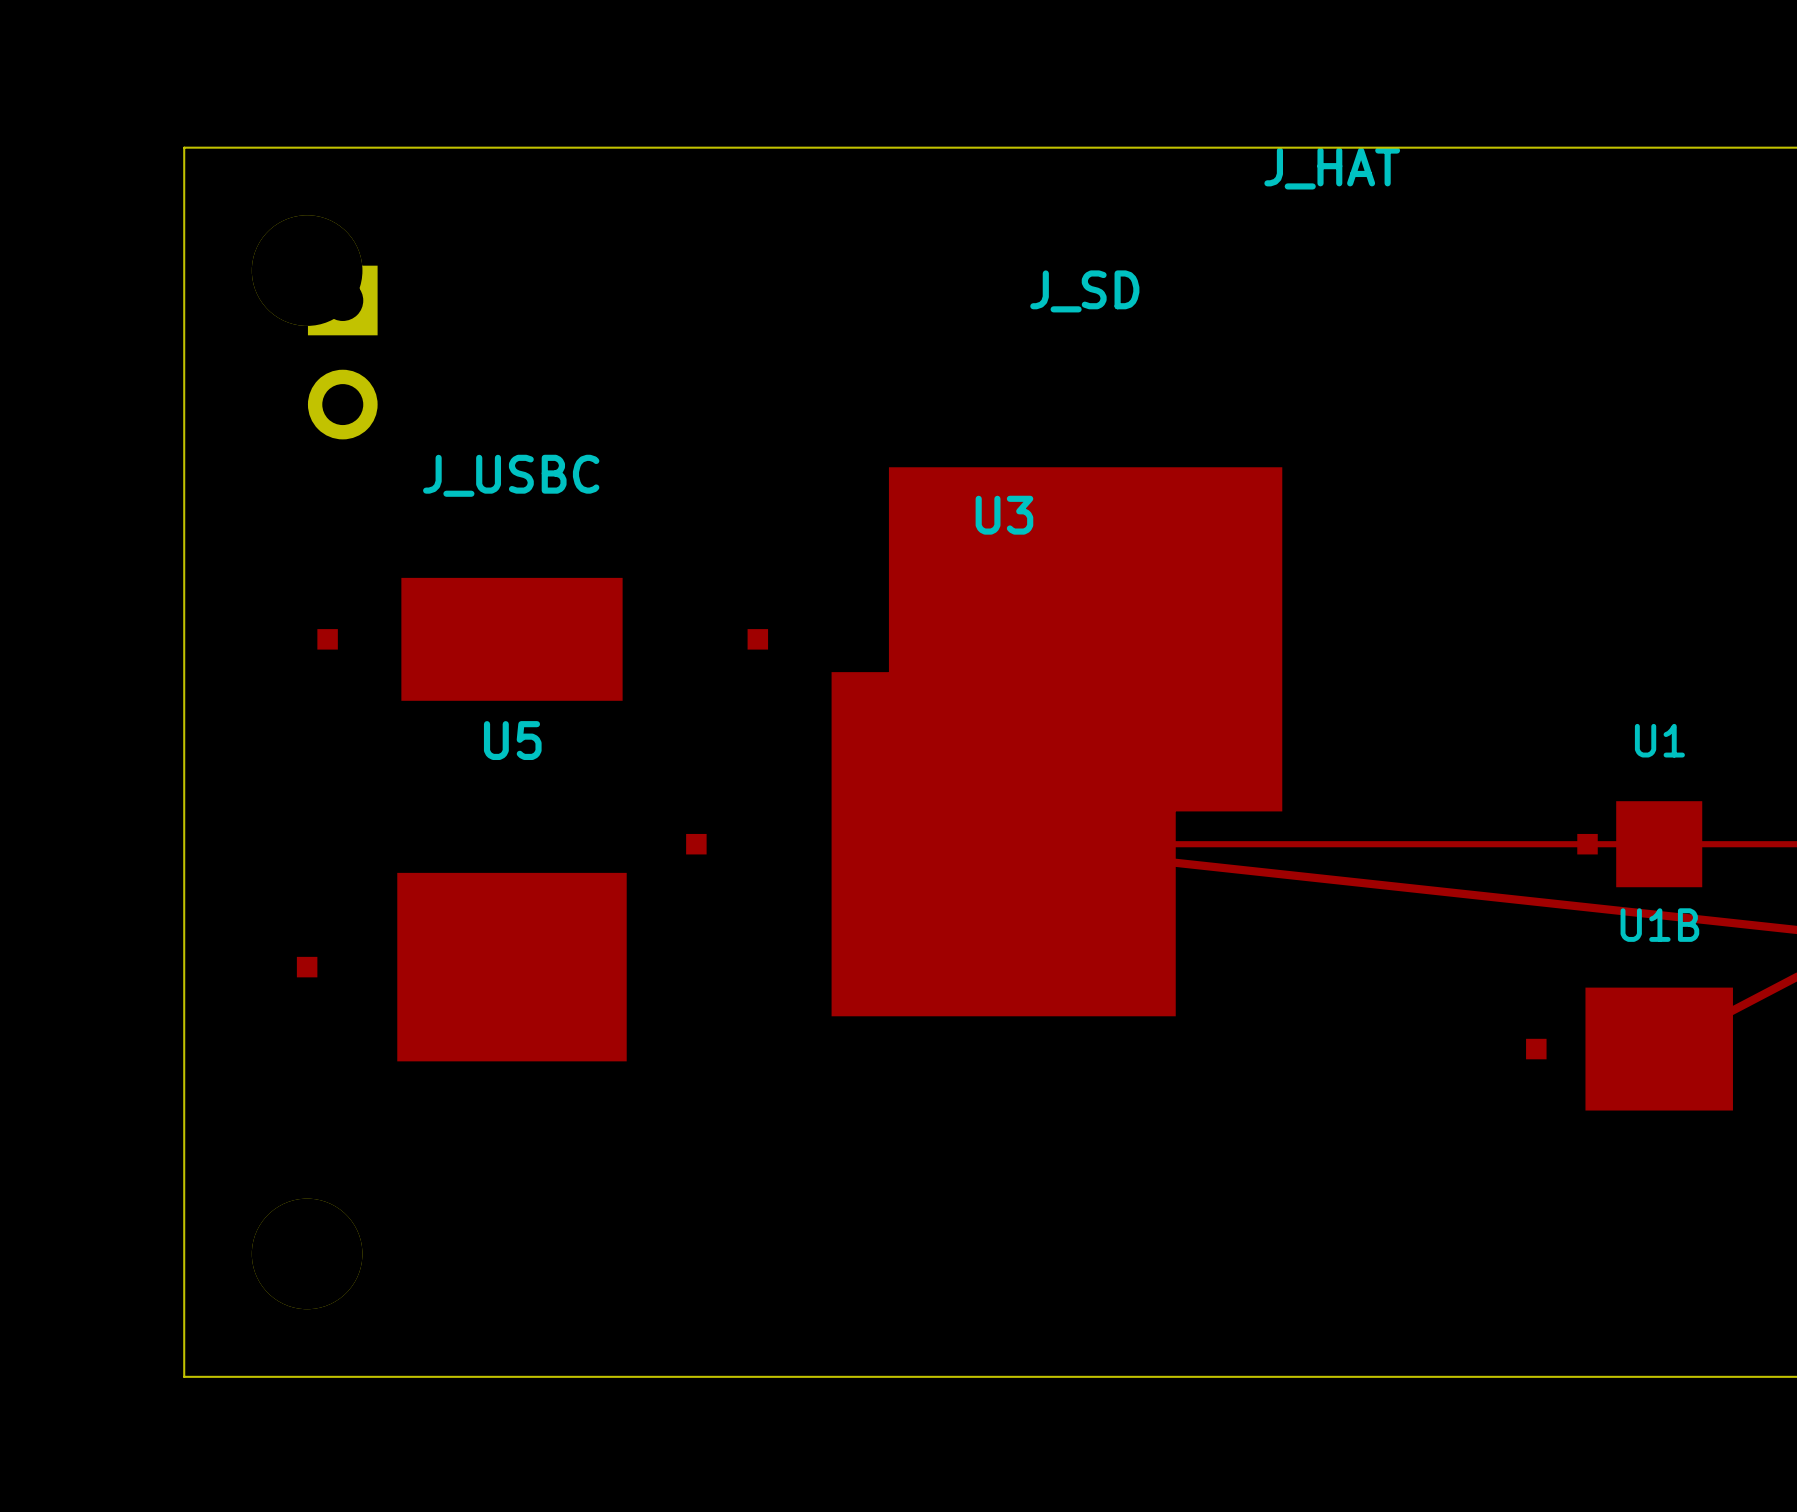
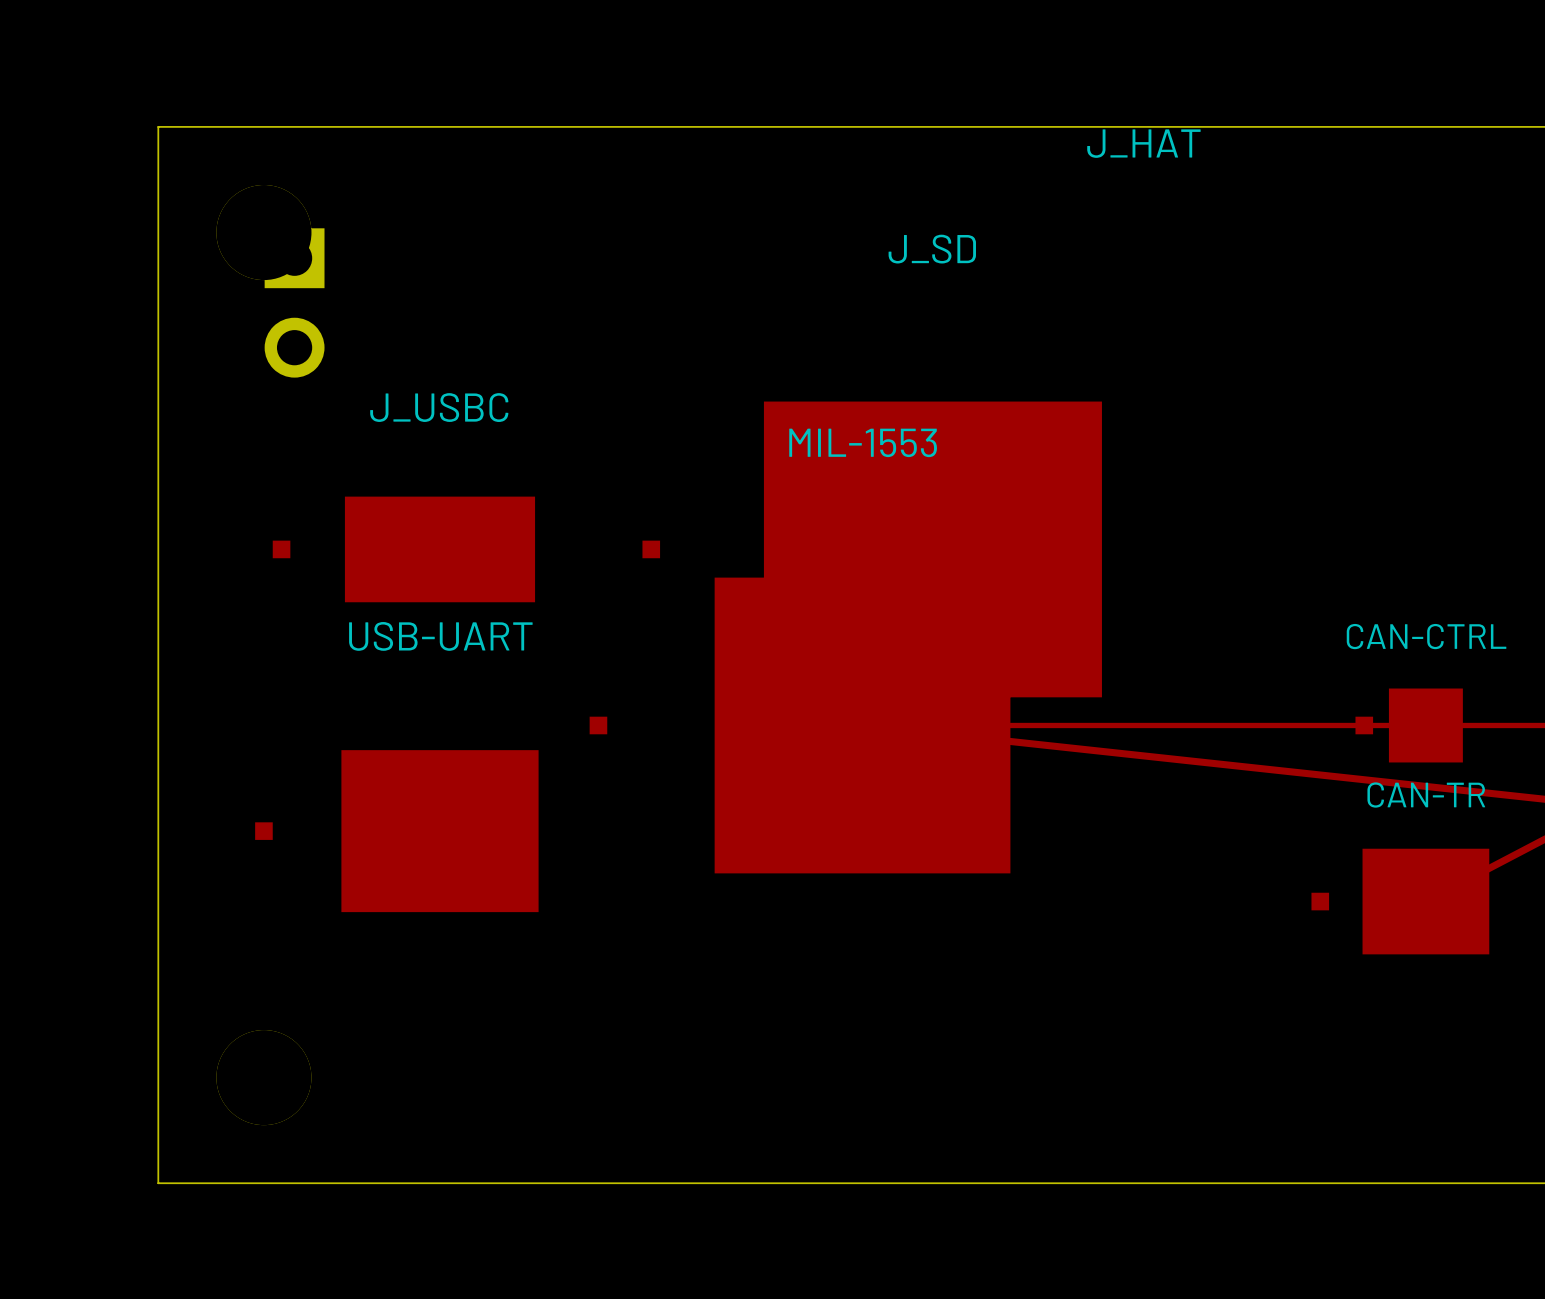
U3 name: U3 (1004, 515) -> MIL-1553 (863, 442)
U5 name: U5 (512, 740) -> USB-UART (440, 636)
U1 name: U1 (1659, 740) -> CAN-CTRL (1426, 636)
U1B name: U1B (1659, 925) -> CAN-TR (1426, 795)

